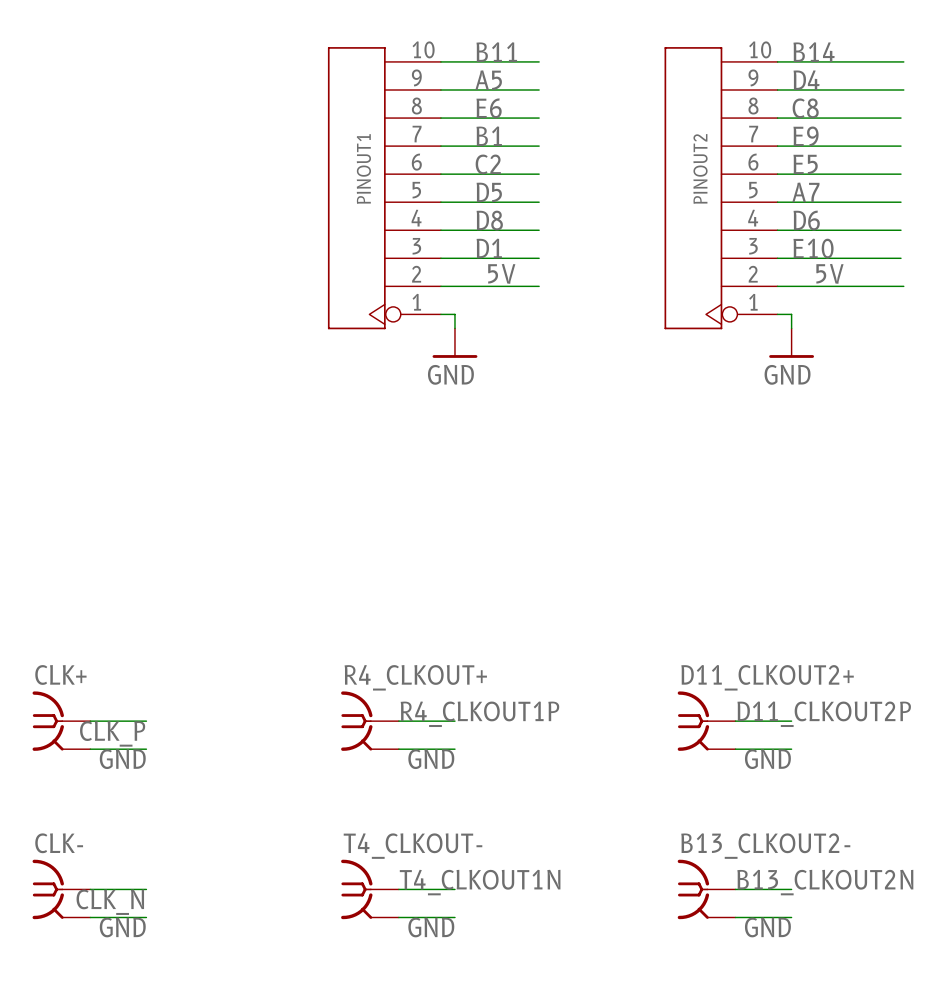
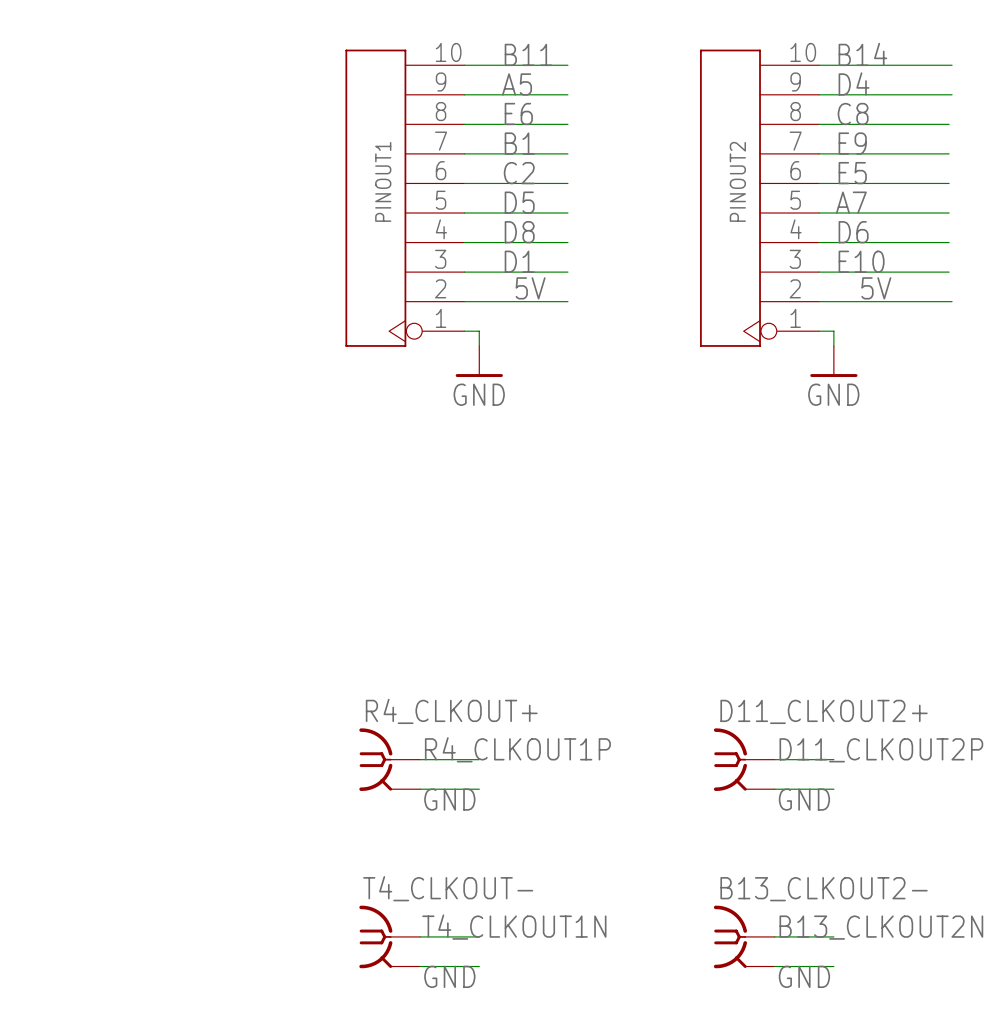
CLK+: (61, 721) -> none
wire: (90, 721) (146, 721) -> none
label: CLK_P (112, 733) -> none
wire: (90, 749) (146, 749) -> none
label: GND (122, 759) -> none
CLK-: (61, 889) -> none
wire: (90, 889) (146, 889) -> none
label: CLK_N (110, 902) -> none
wire: (90, 917) (146, 917) -> none
label: GND (122, 927) -> none

